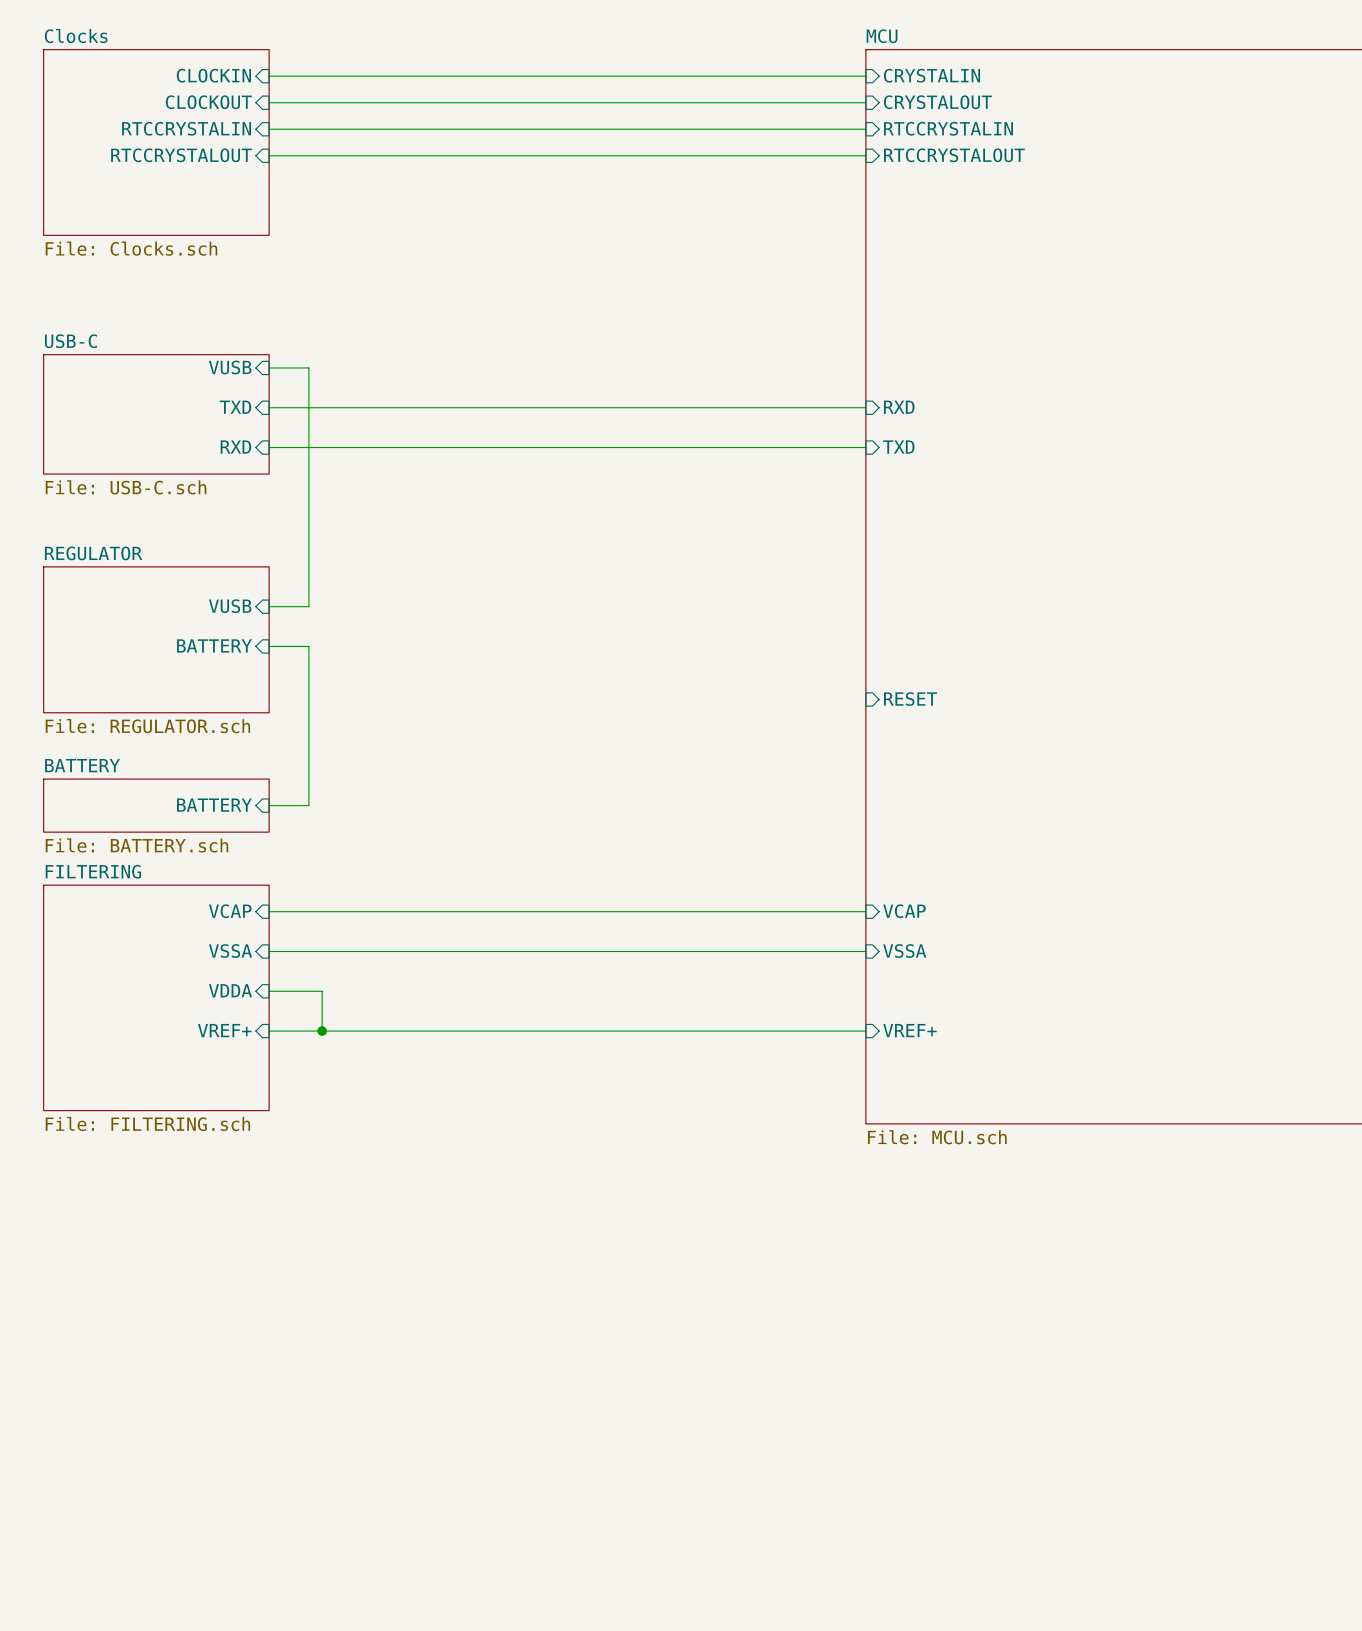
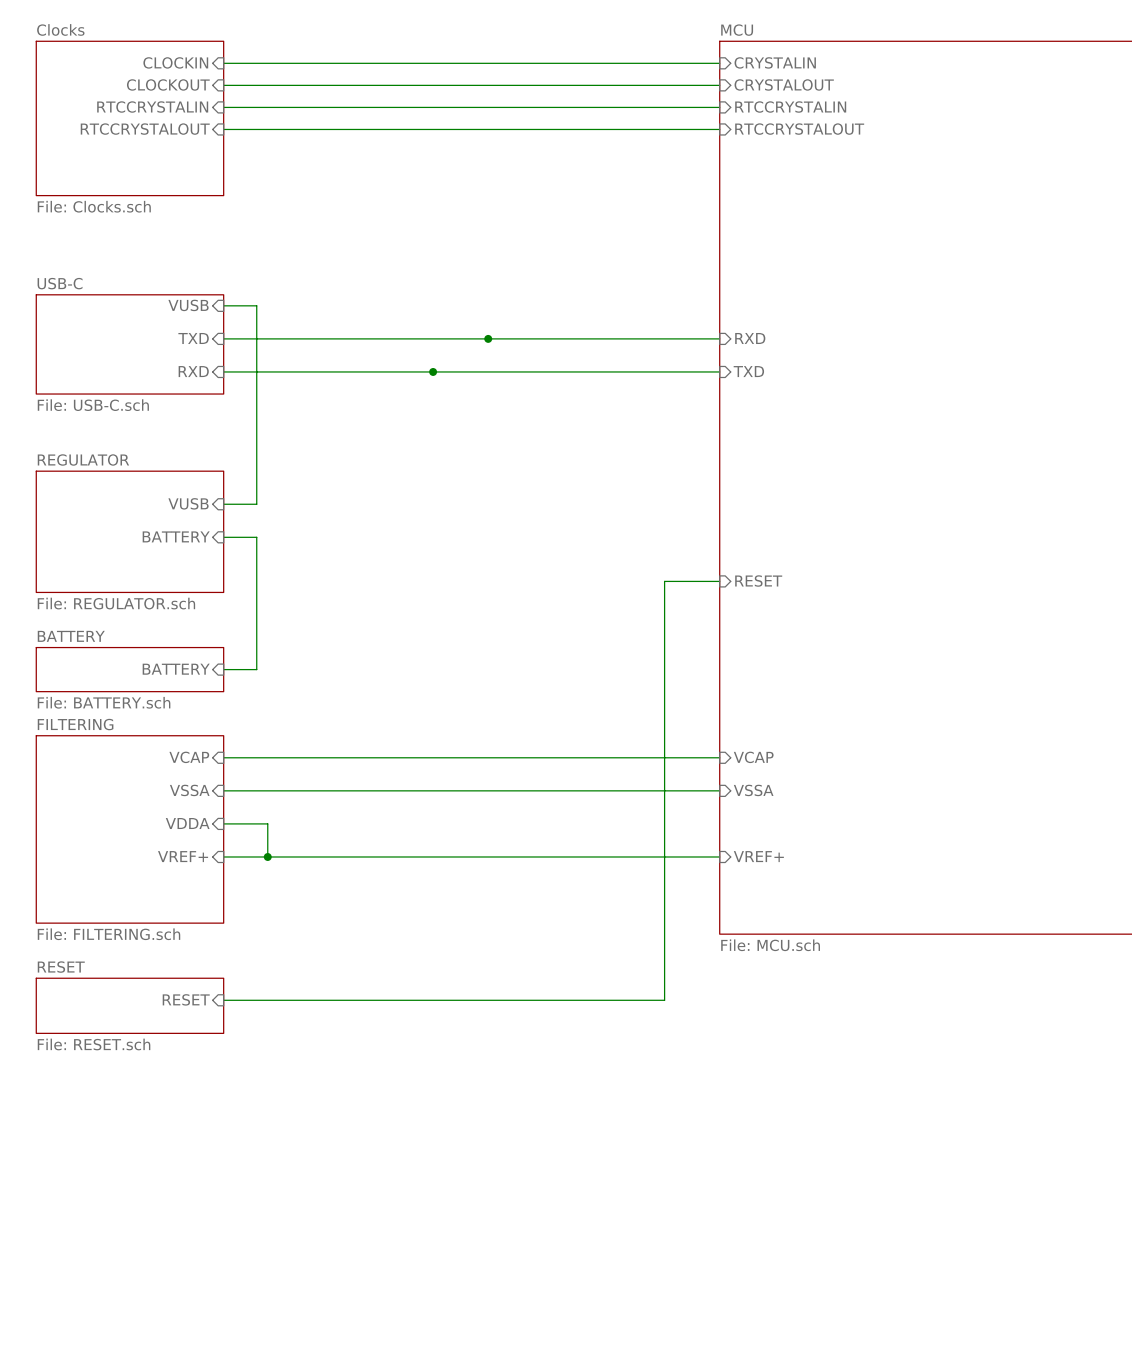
junction: none -> (488, 338)
junction: none -> (433, 371)
wire: none -> (719, 581) (664, 581) (664, 1000) (223, 1000)
sheet pin: none -> RESET (186, 999)
sheet RESET: none -> File: RESET.sch (129, 1005)

